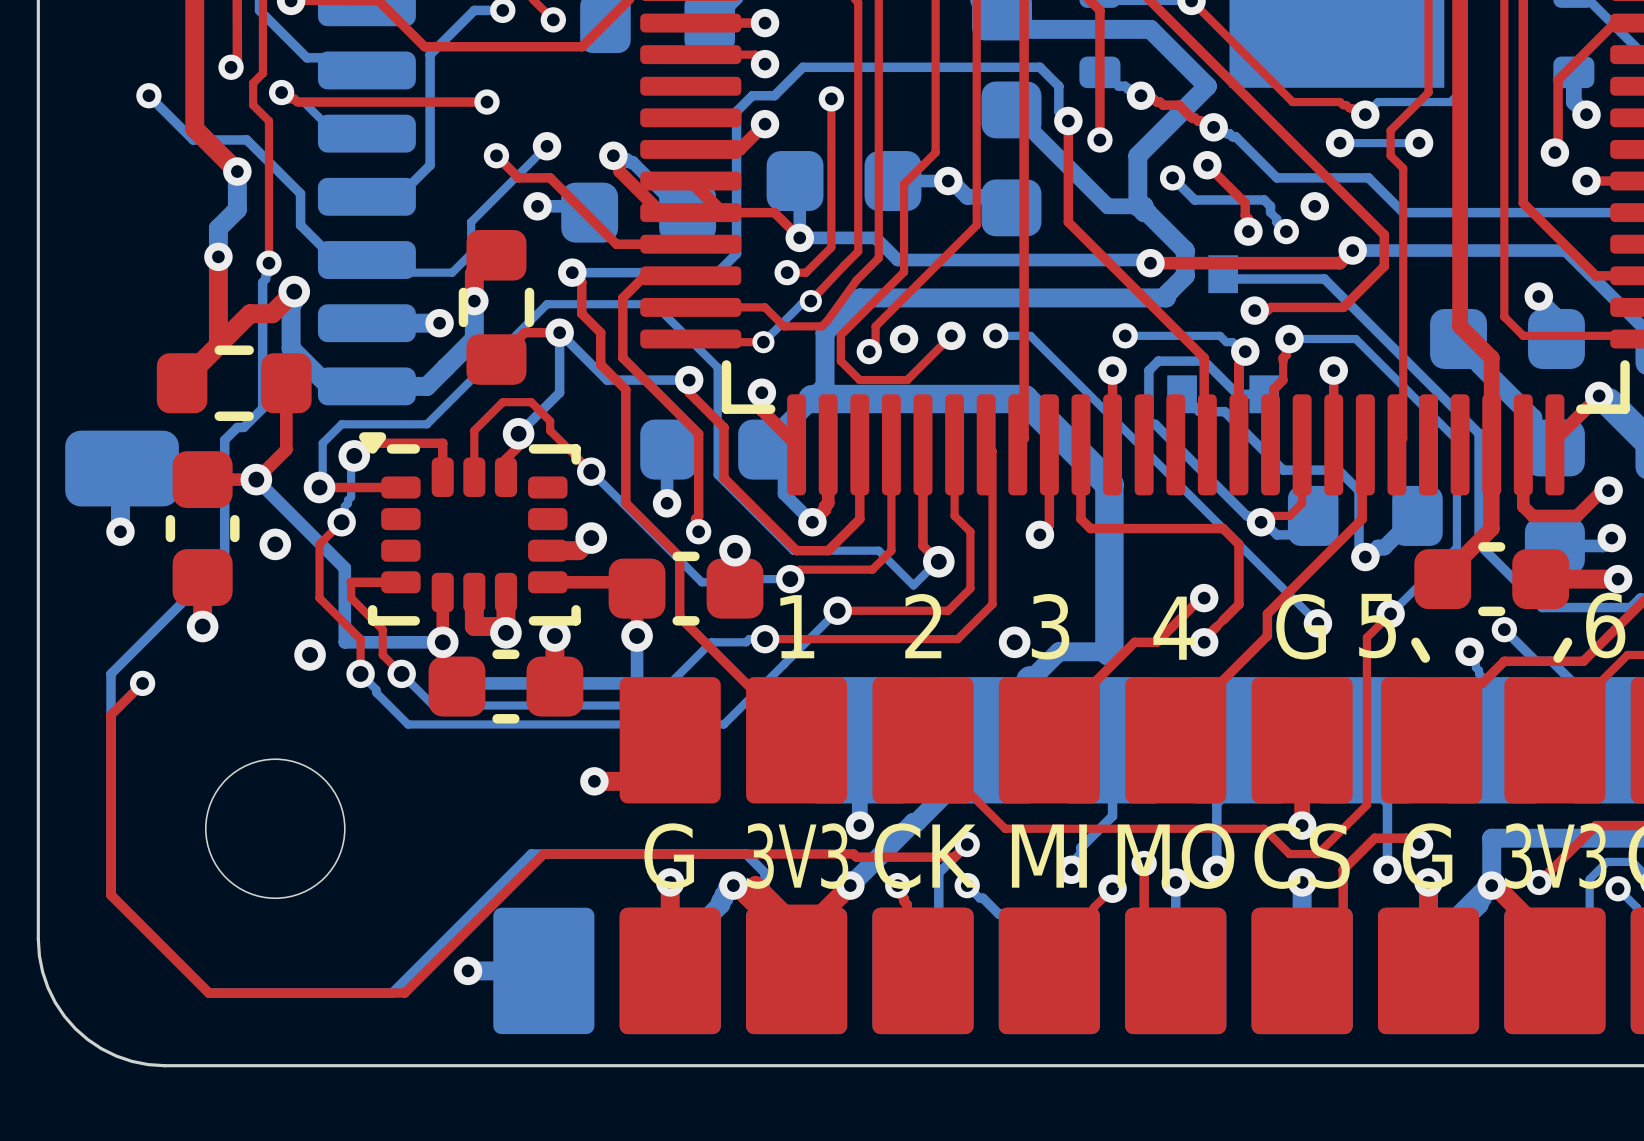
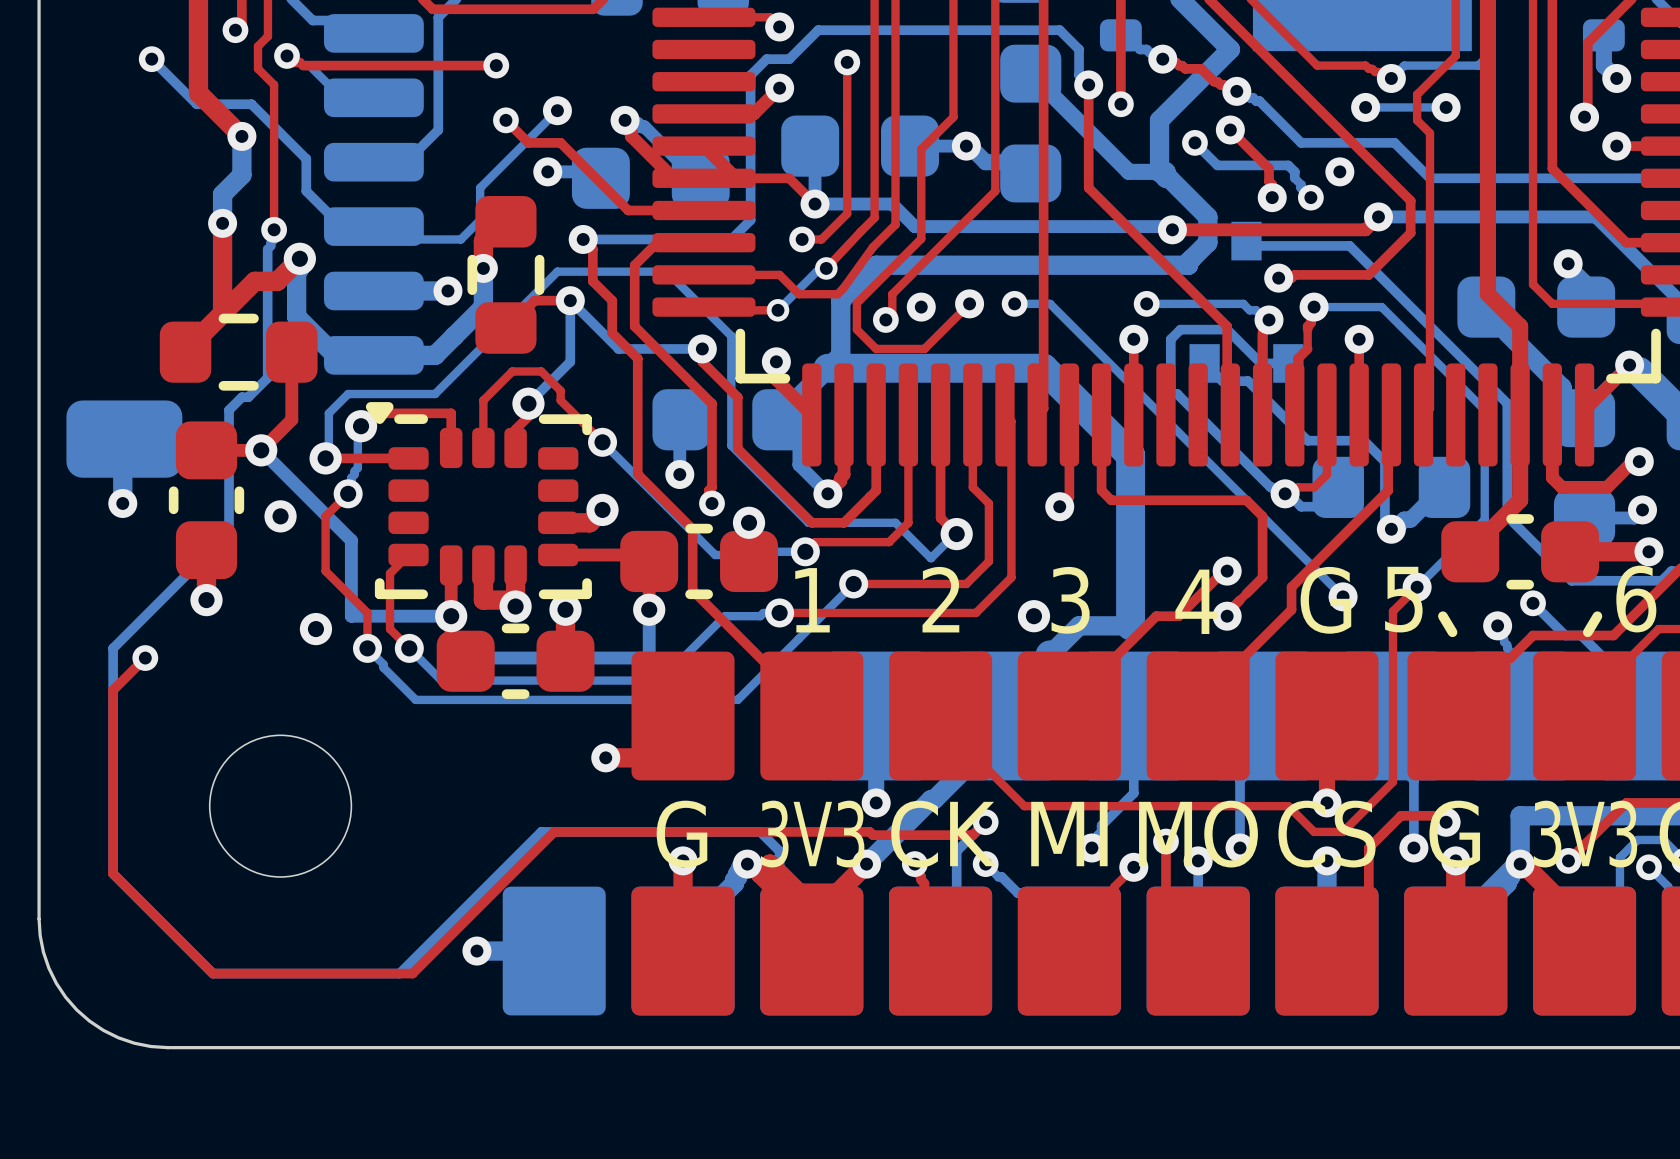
top track: (400, 582) (351, 582) (351, 598) (382, 629) -> (408, 555) (390, 573) (390, 603)

